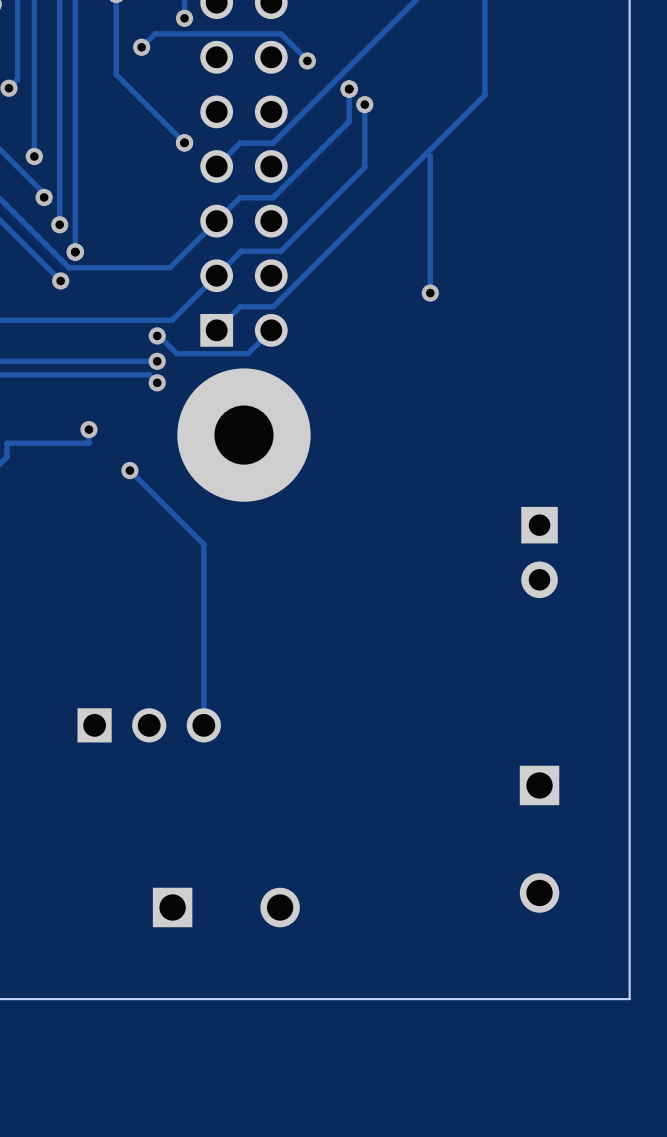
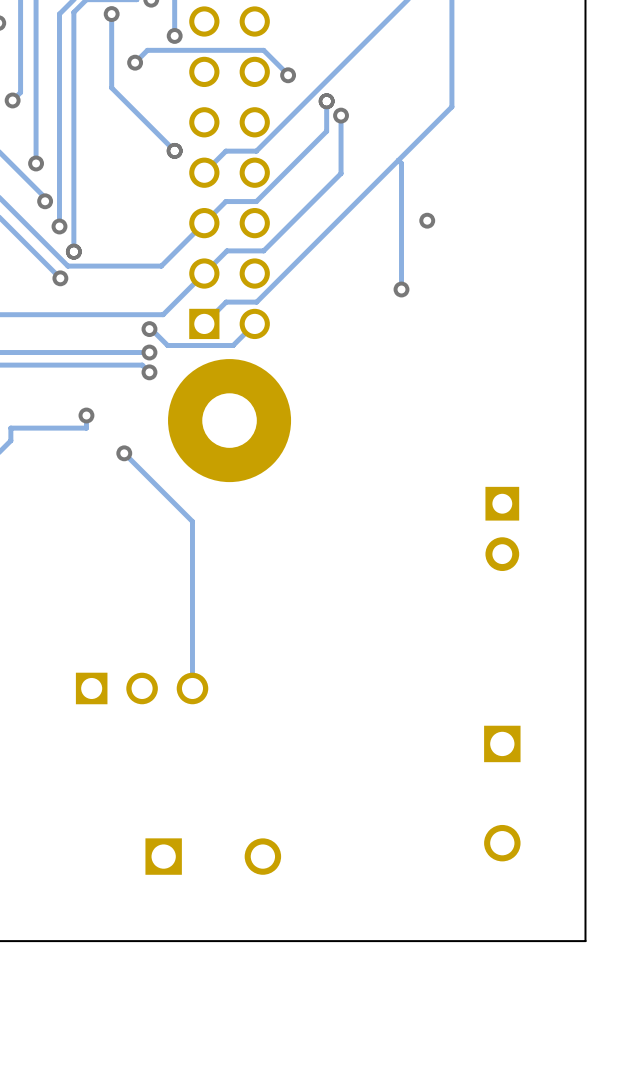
via: none -> (427, 220)

